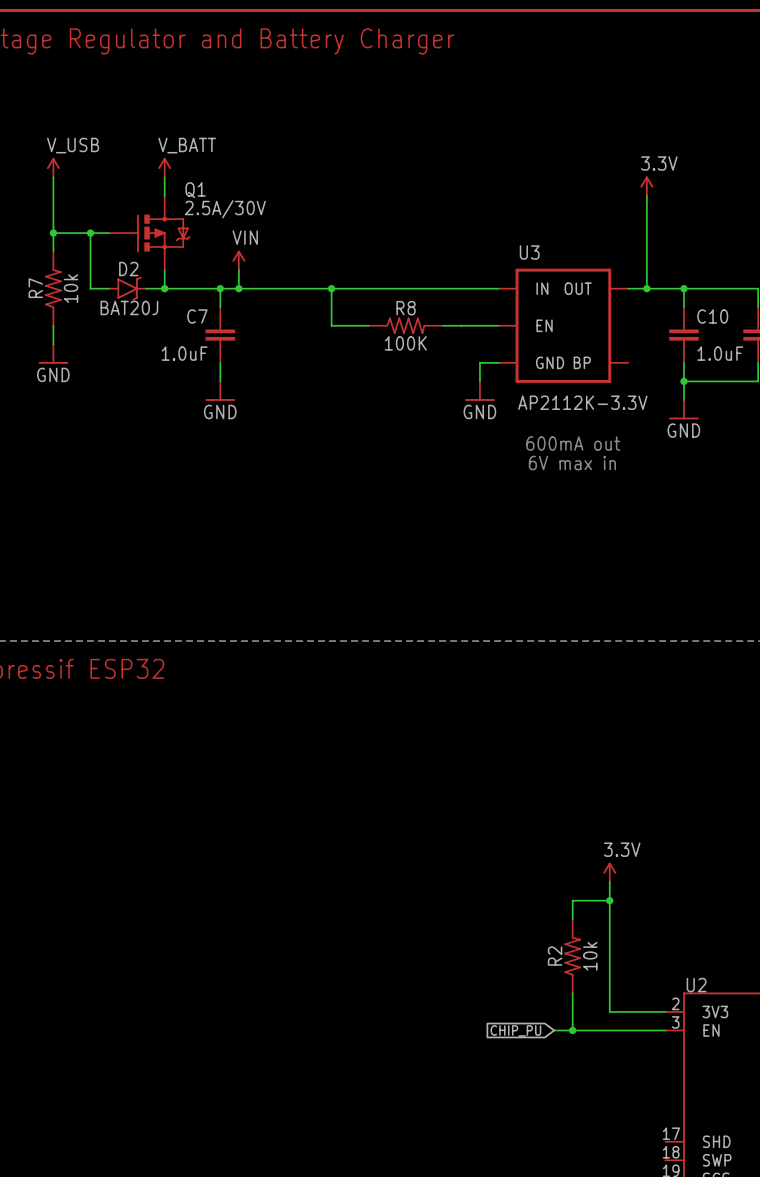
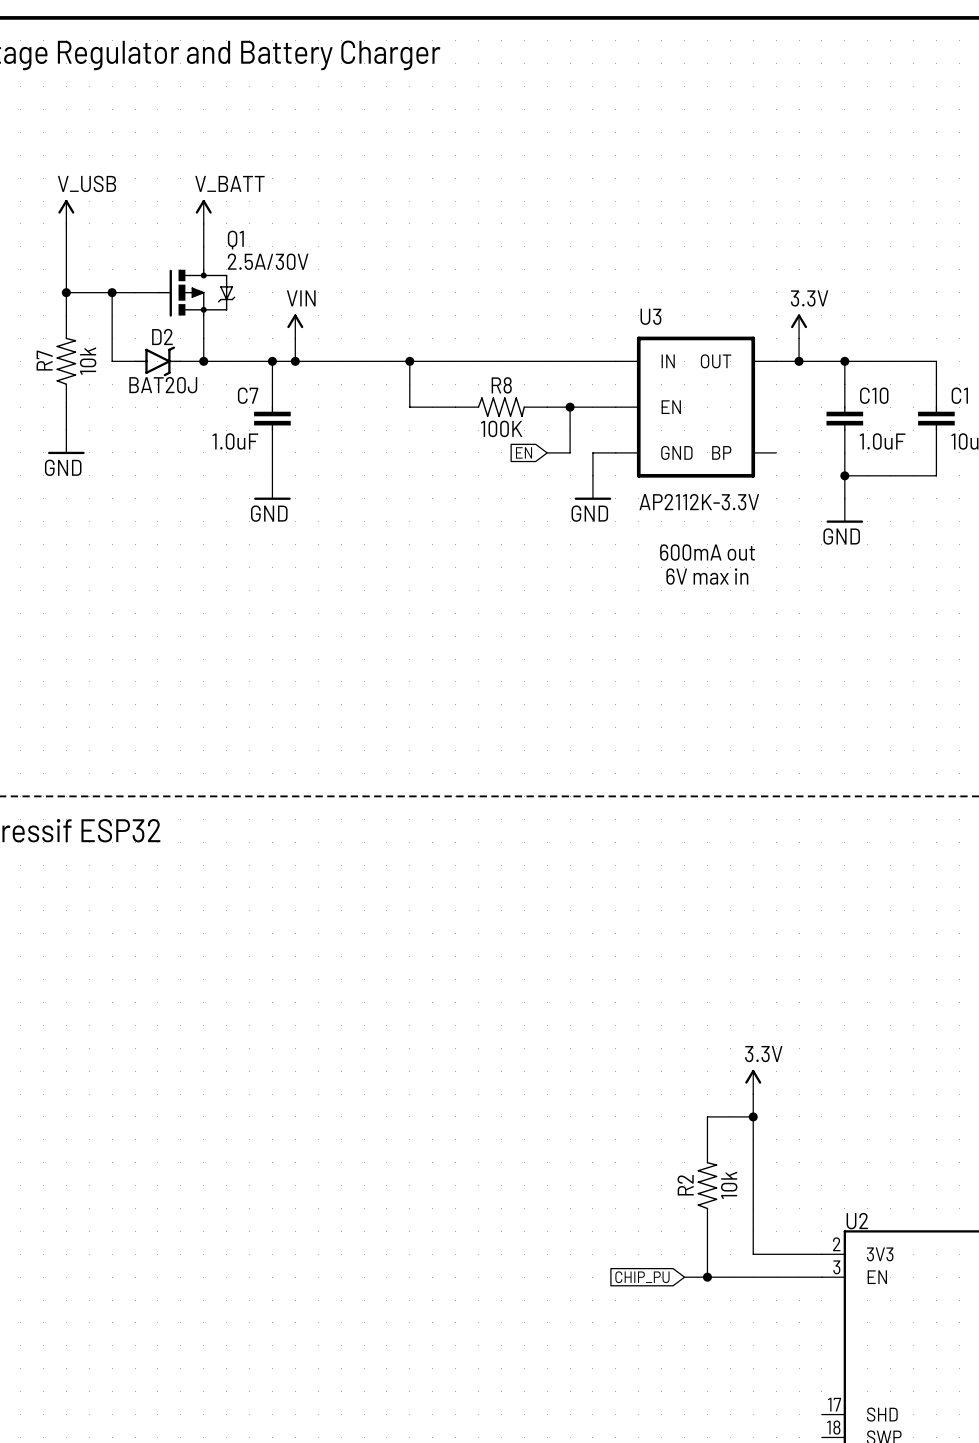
power symbol position: 3.3V (646, 186) -> 3.3V (799, 326)
wire: (646, 195) (646, 270) -> none
wire: none -> (570, 407) (570, 452) (547, 452)
junction: none -> (570, 407)
global label: none -> EN (524, 452)

